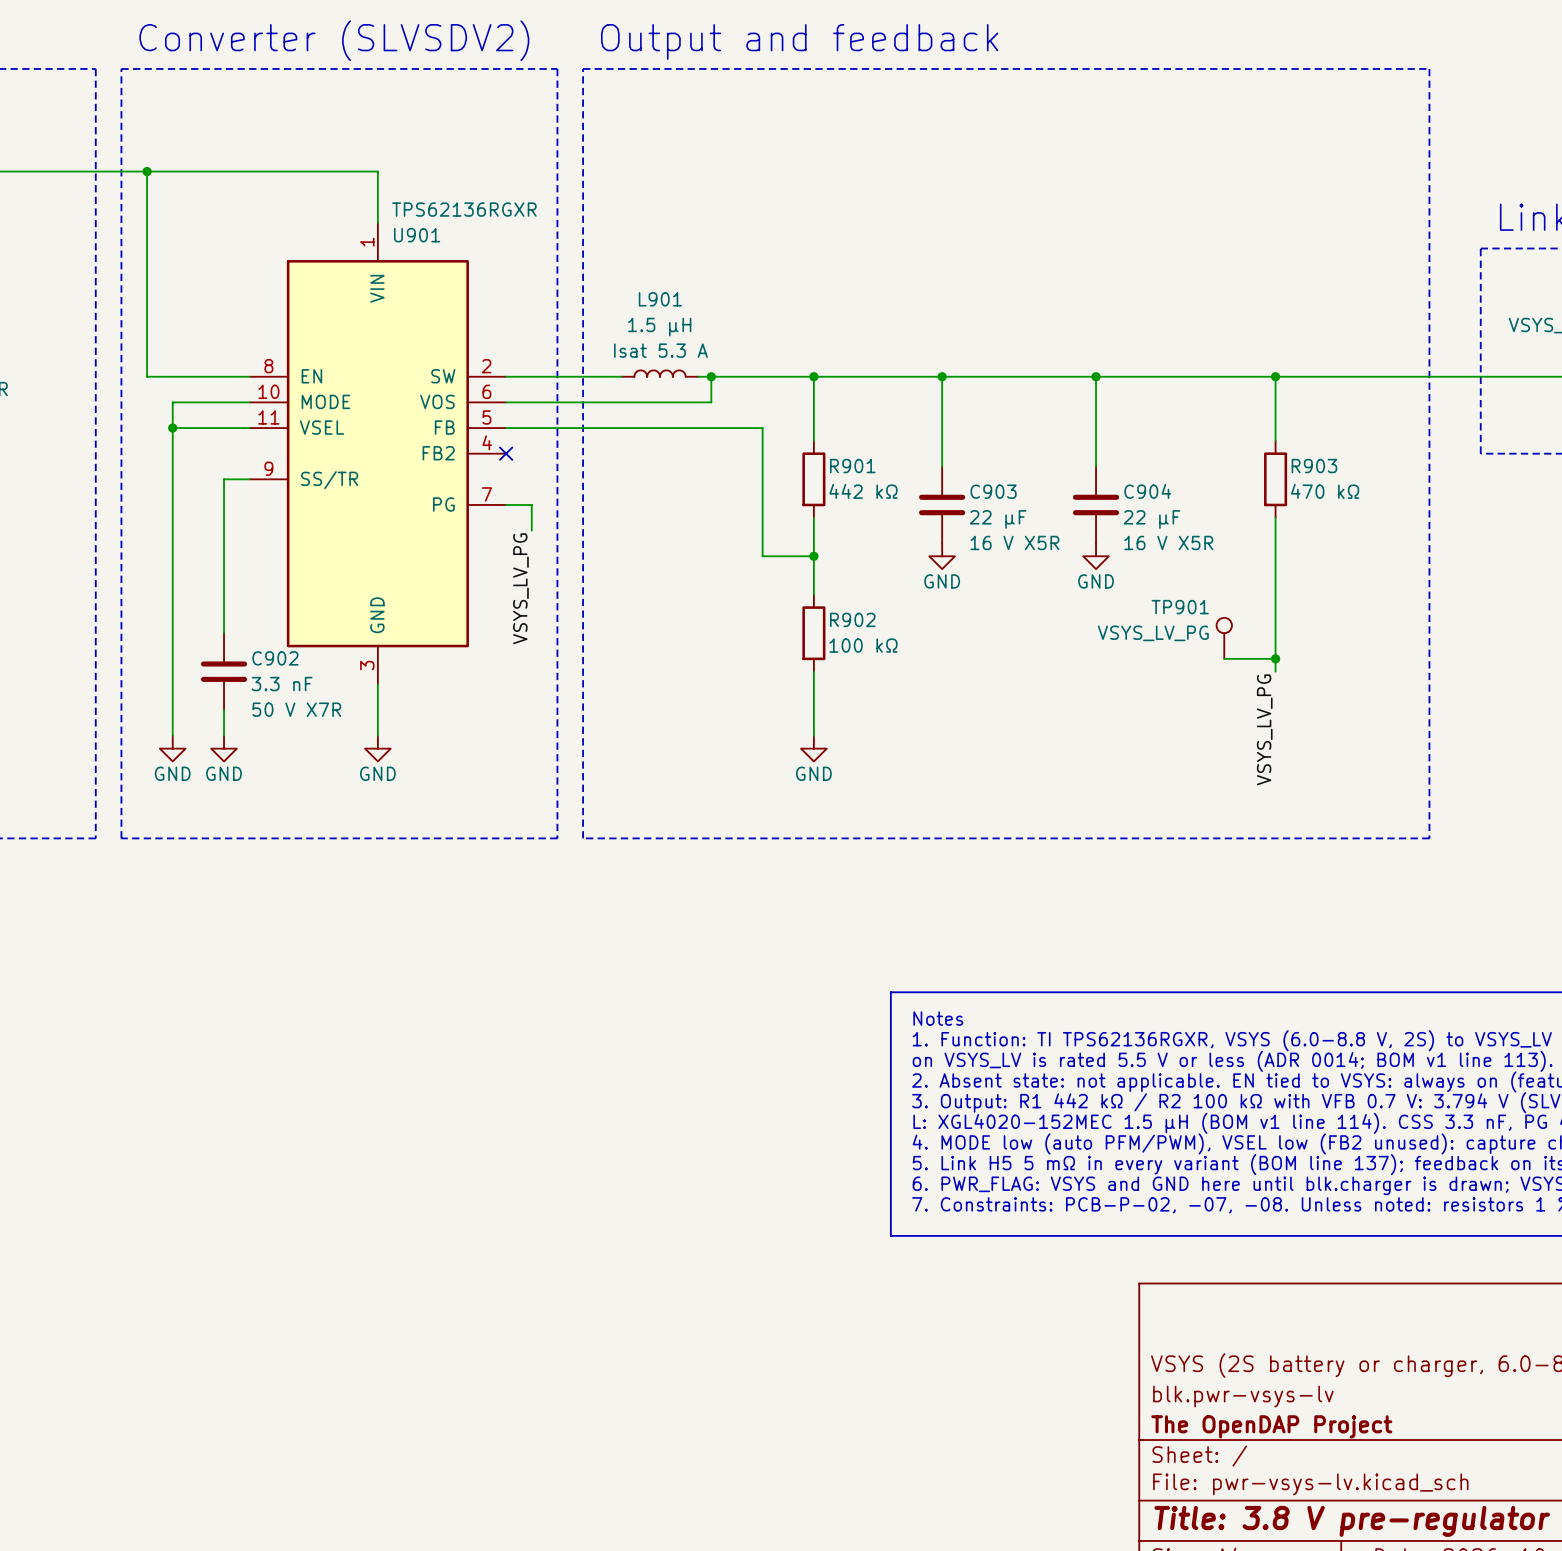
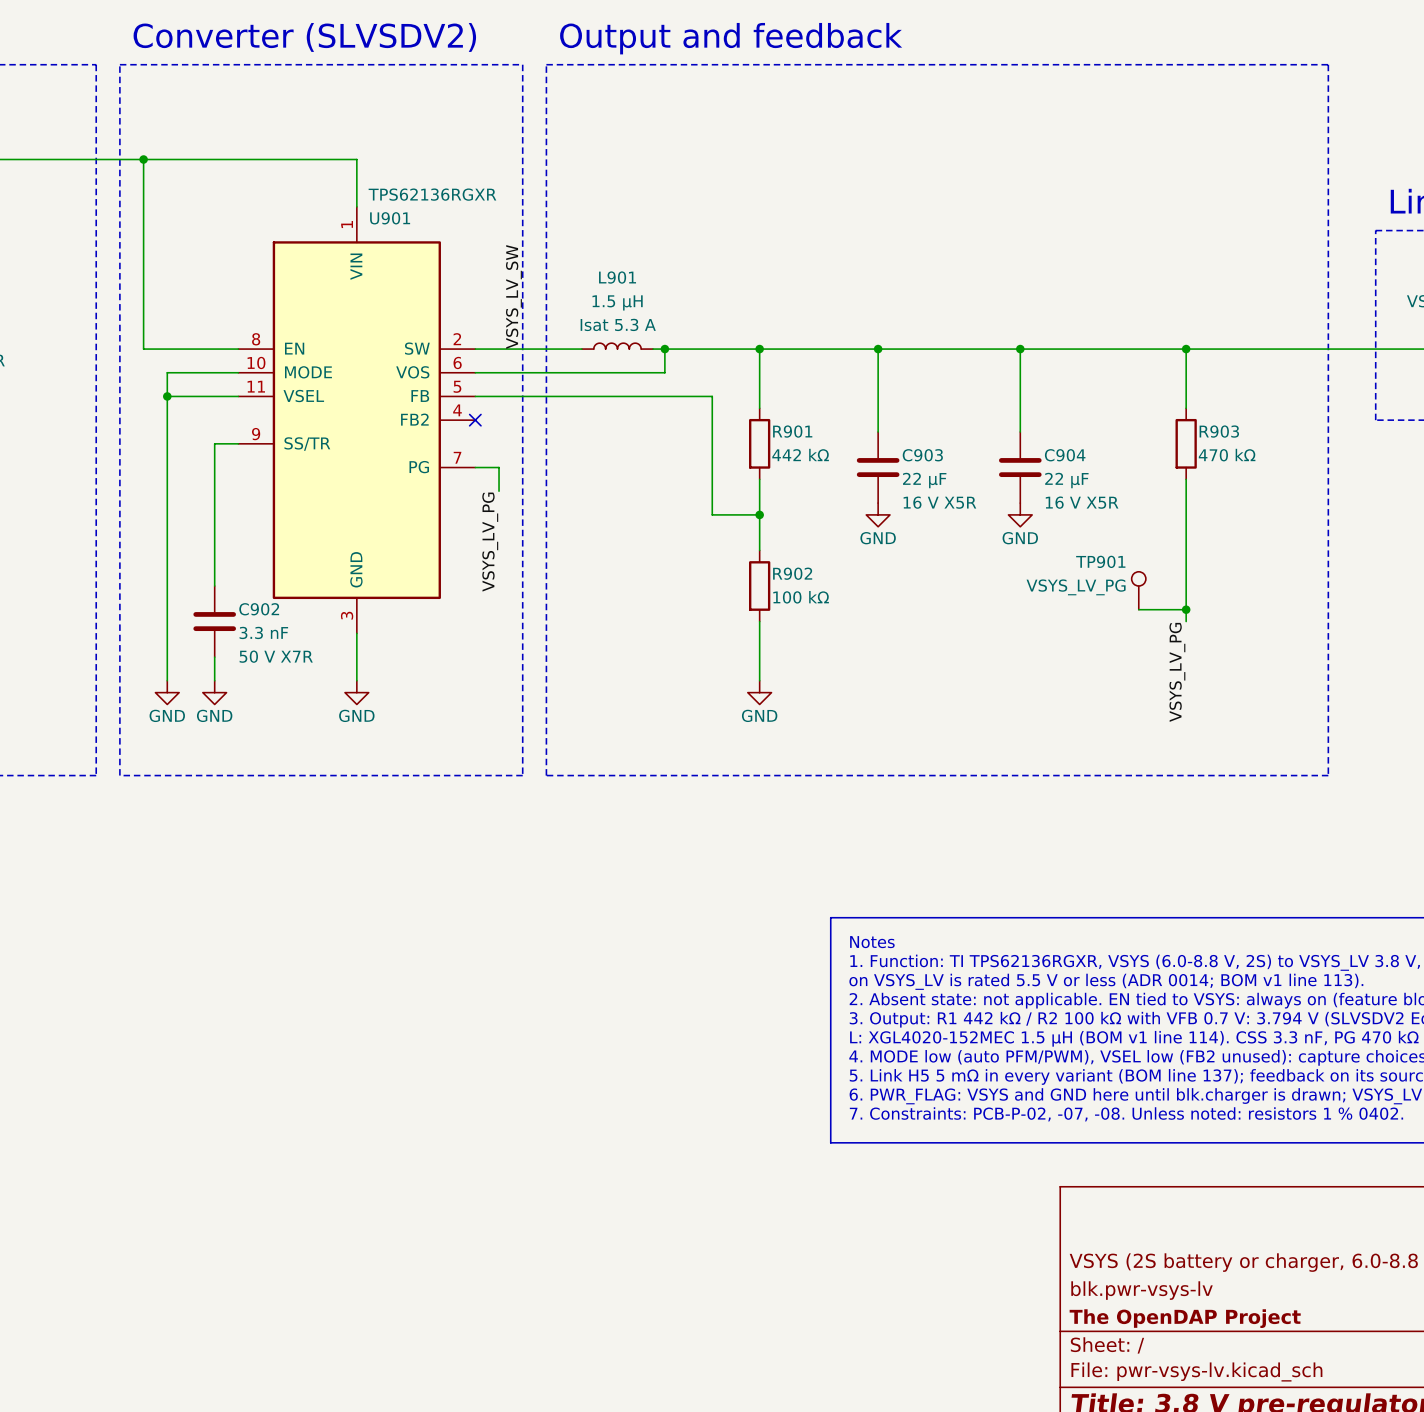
label: none -> VSYS_LV_SW (513, 297)

